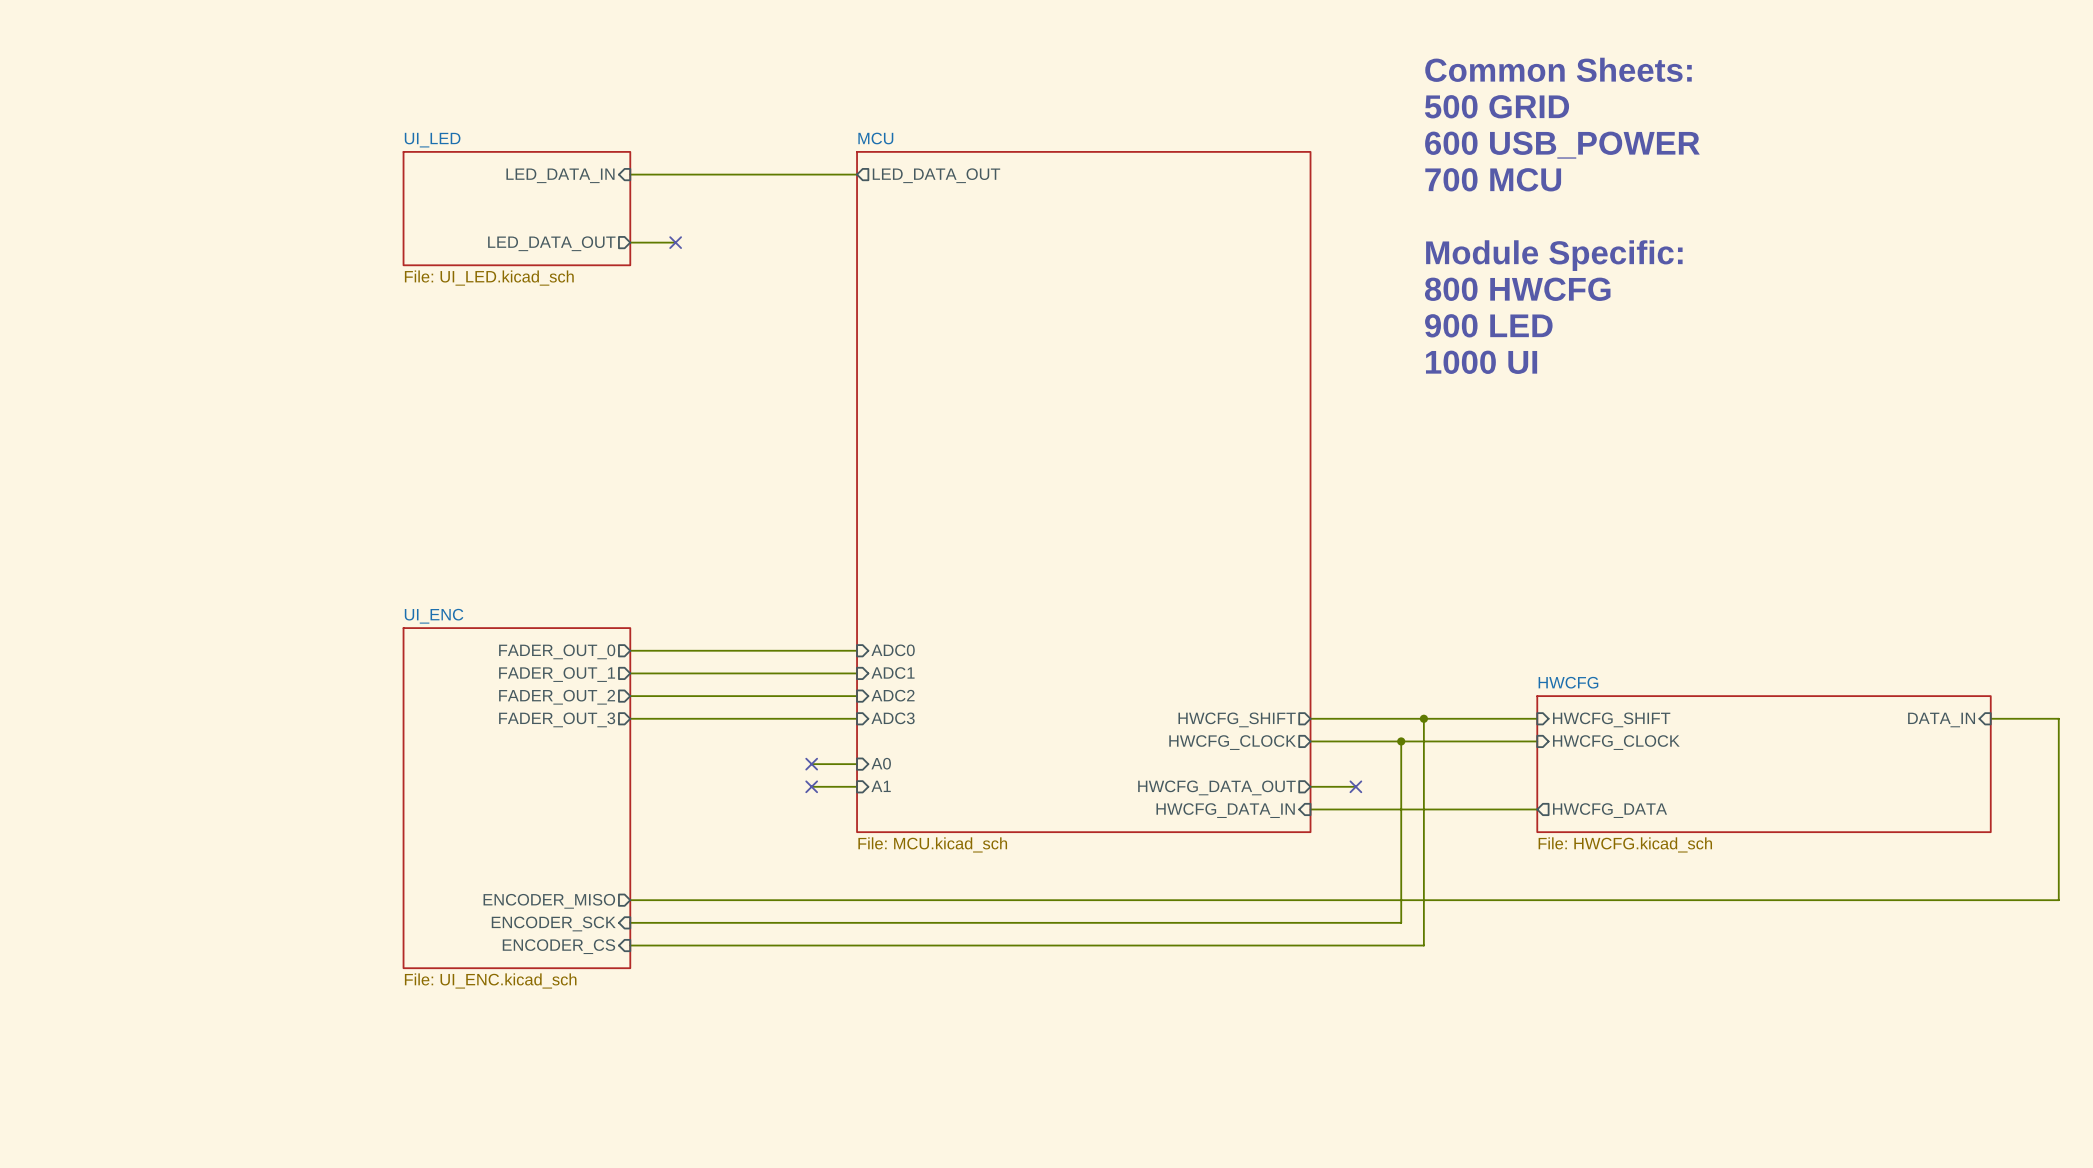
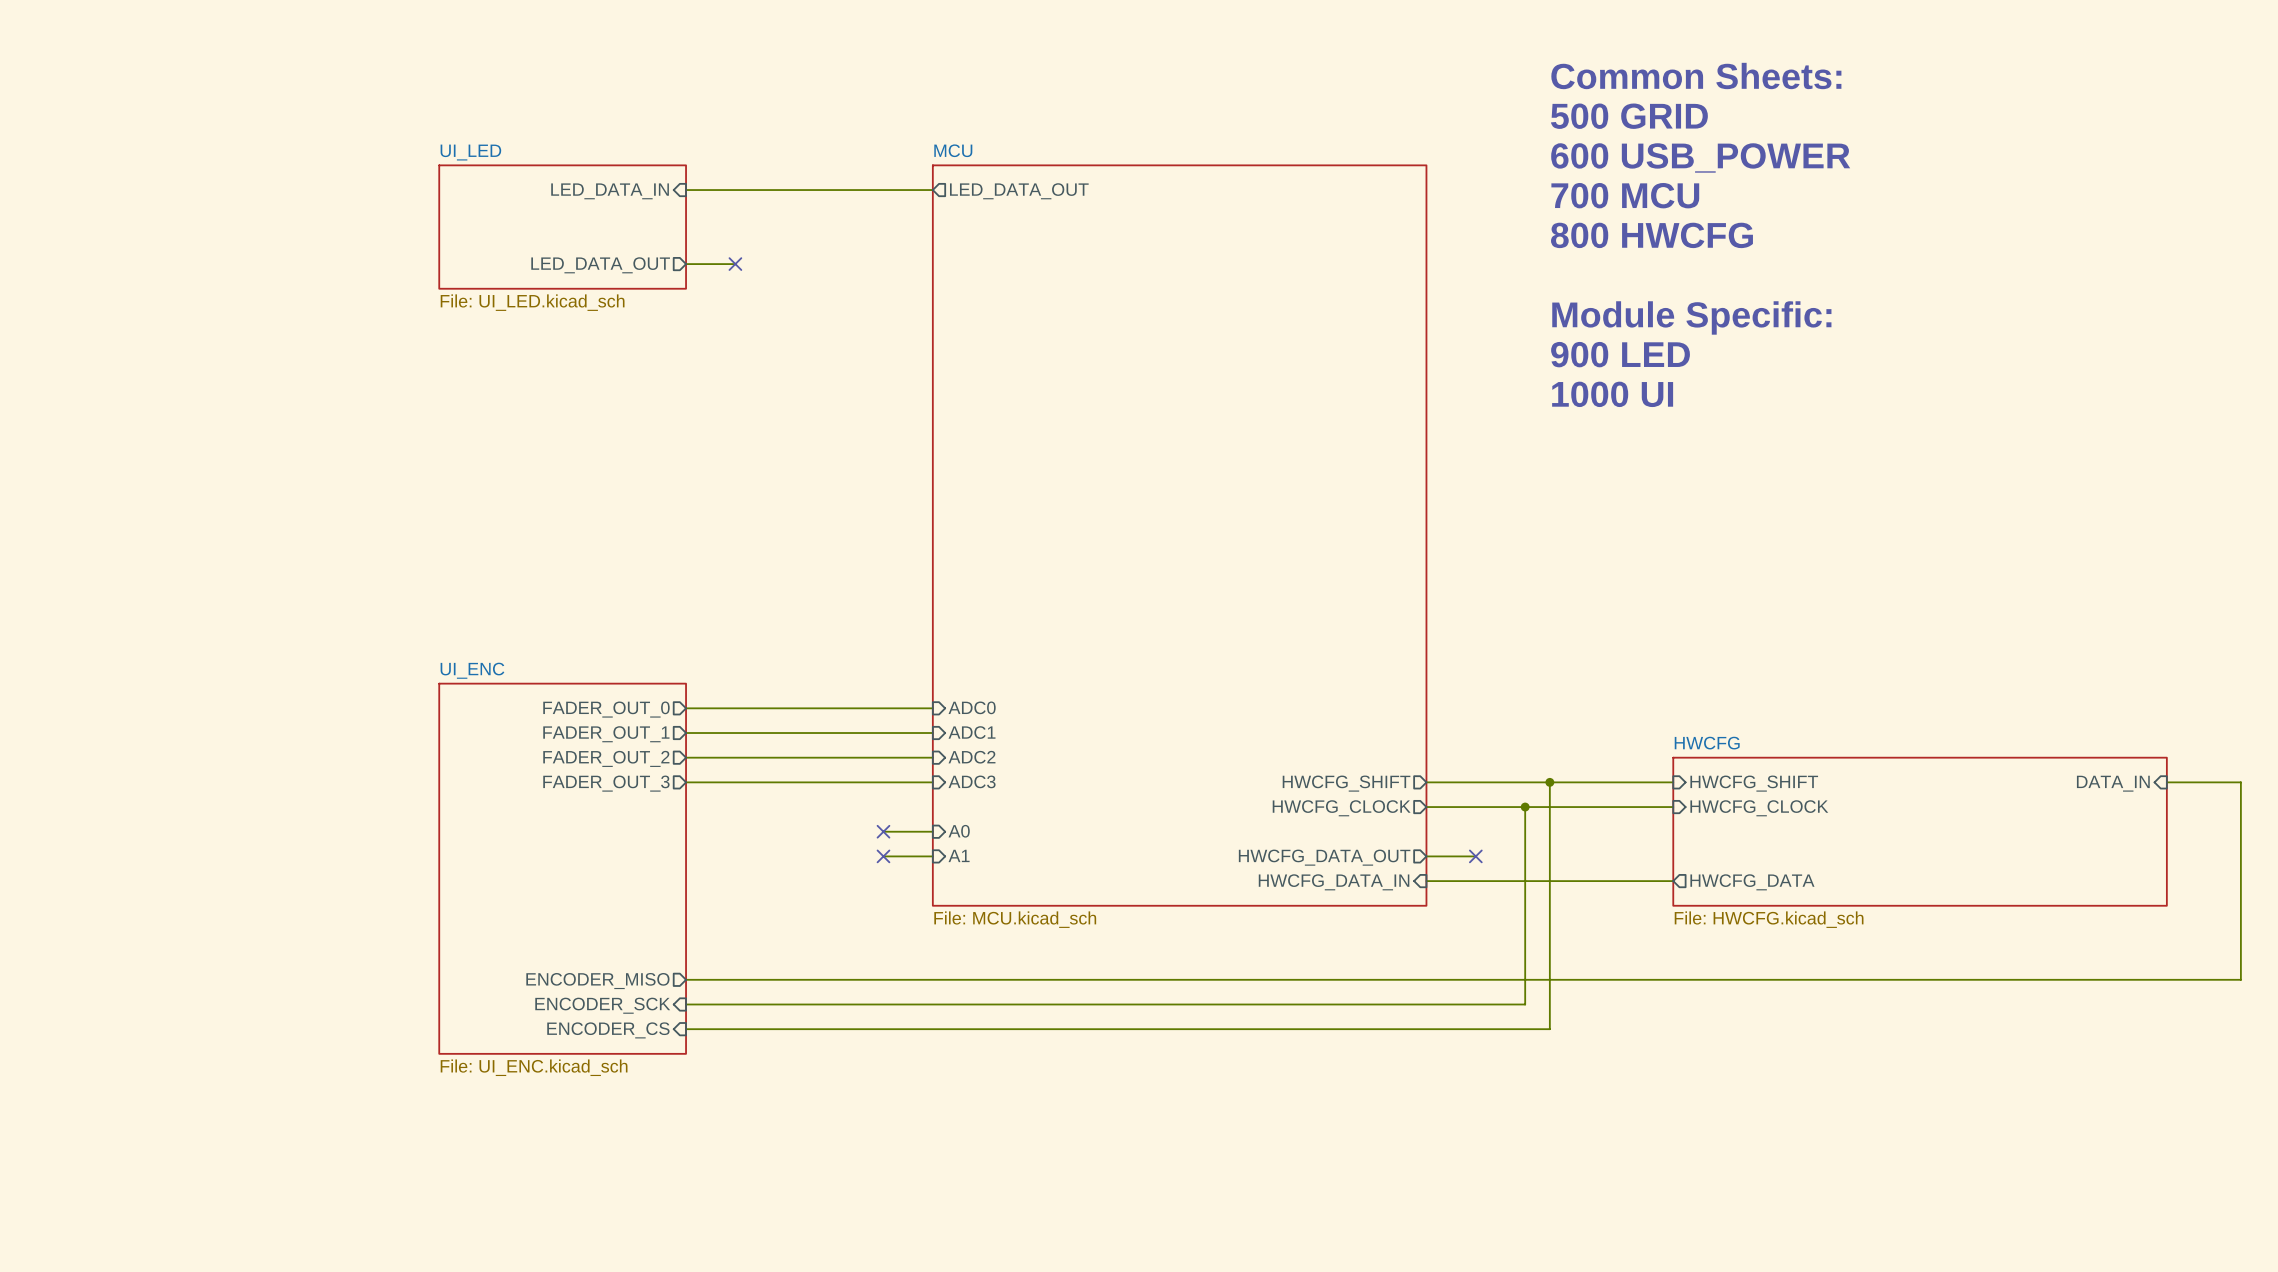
text: none -> 800 HWCFG (1651, 235)
text: Module Specific: (1554, 255) -> none
text: 800 HWCFG (1517, 289) -> Module Specific: (1691, 317)

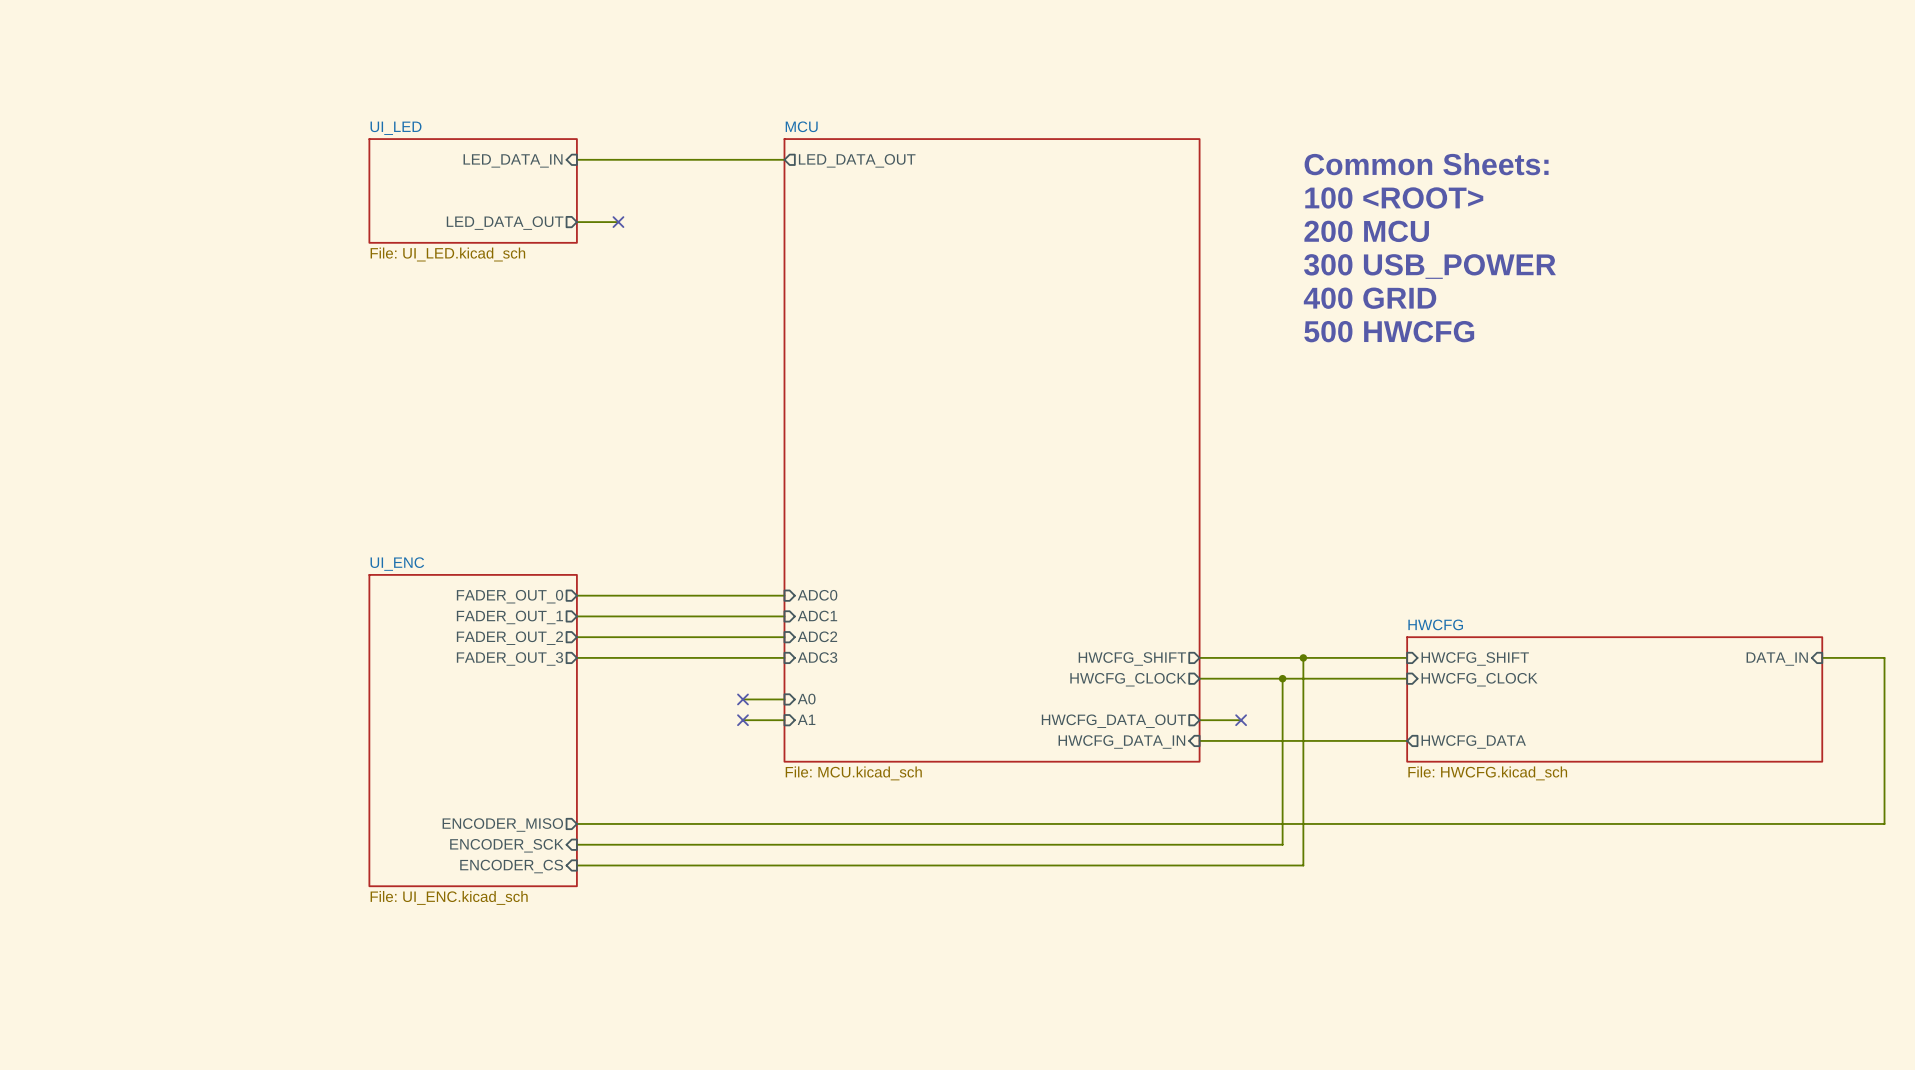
text: Common Sheets: (1696, 76) -> none
text: 500 GRID (1629, 116) -> none
text: 600 USB_POWER (1700, 157) -> none
text: 700 MCU (1625, 195) -> Common Sheets: (1426, 164)
text: 800 HWCFG (1651, 235) -> 100 <ROOT> (1394, 197)
text: none -> 200 MCU (1366, 231)
text: Module Specific: (1691, 317) -> 300 USB_POWER (1429, 266)
text: 900 LED (1620, 354) -> 400 GRID (1370, 298)
text: 1000 UI (1612, 394) -> 500 HWCFG (1389, 331)

